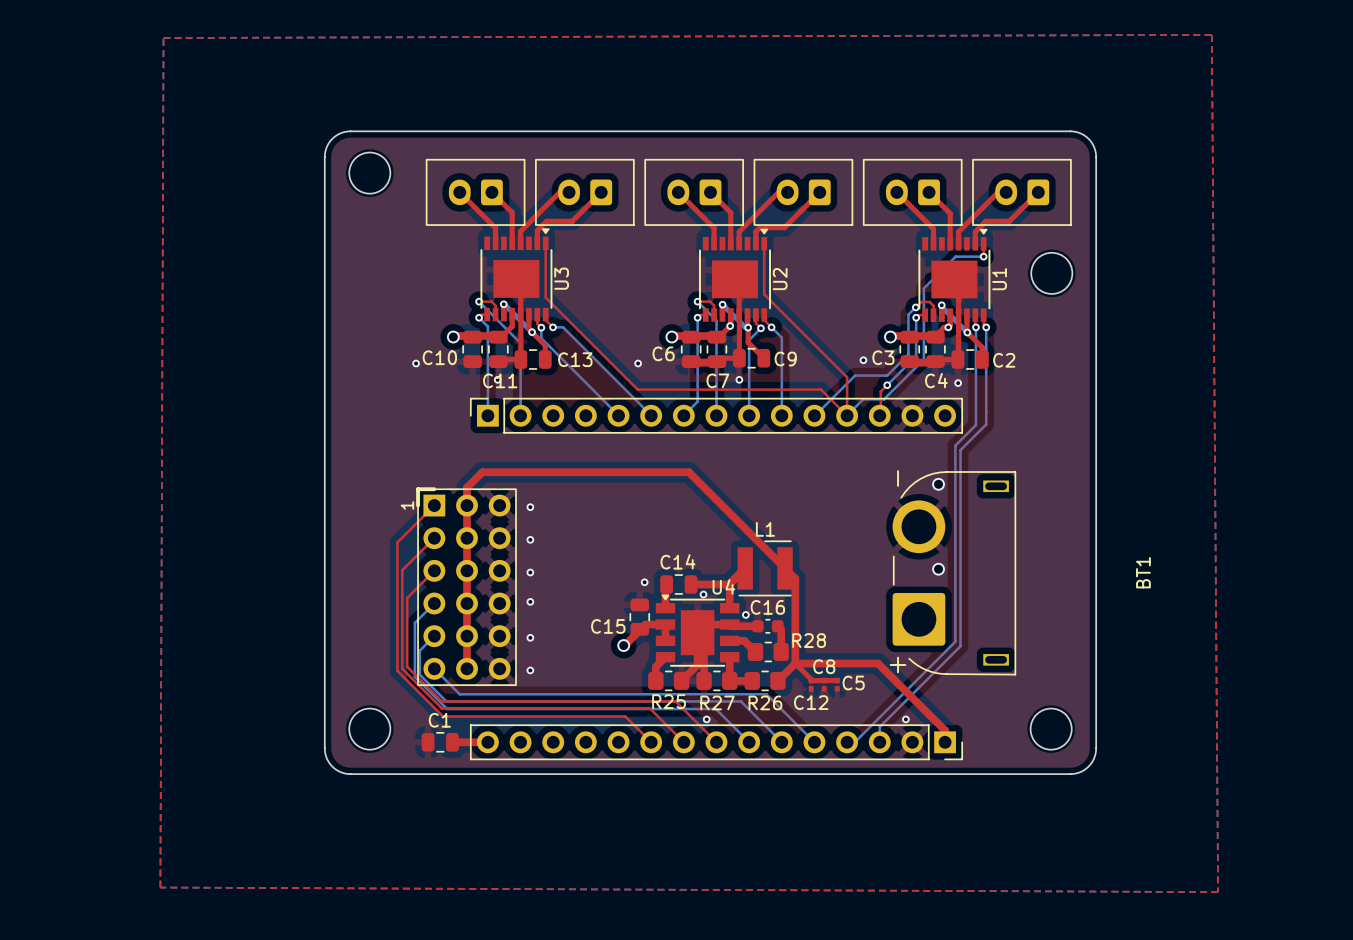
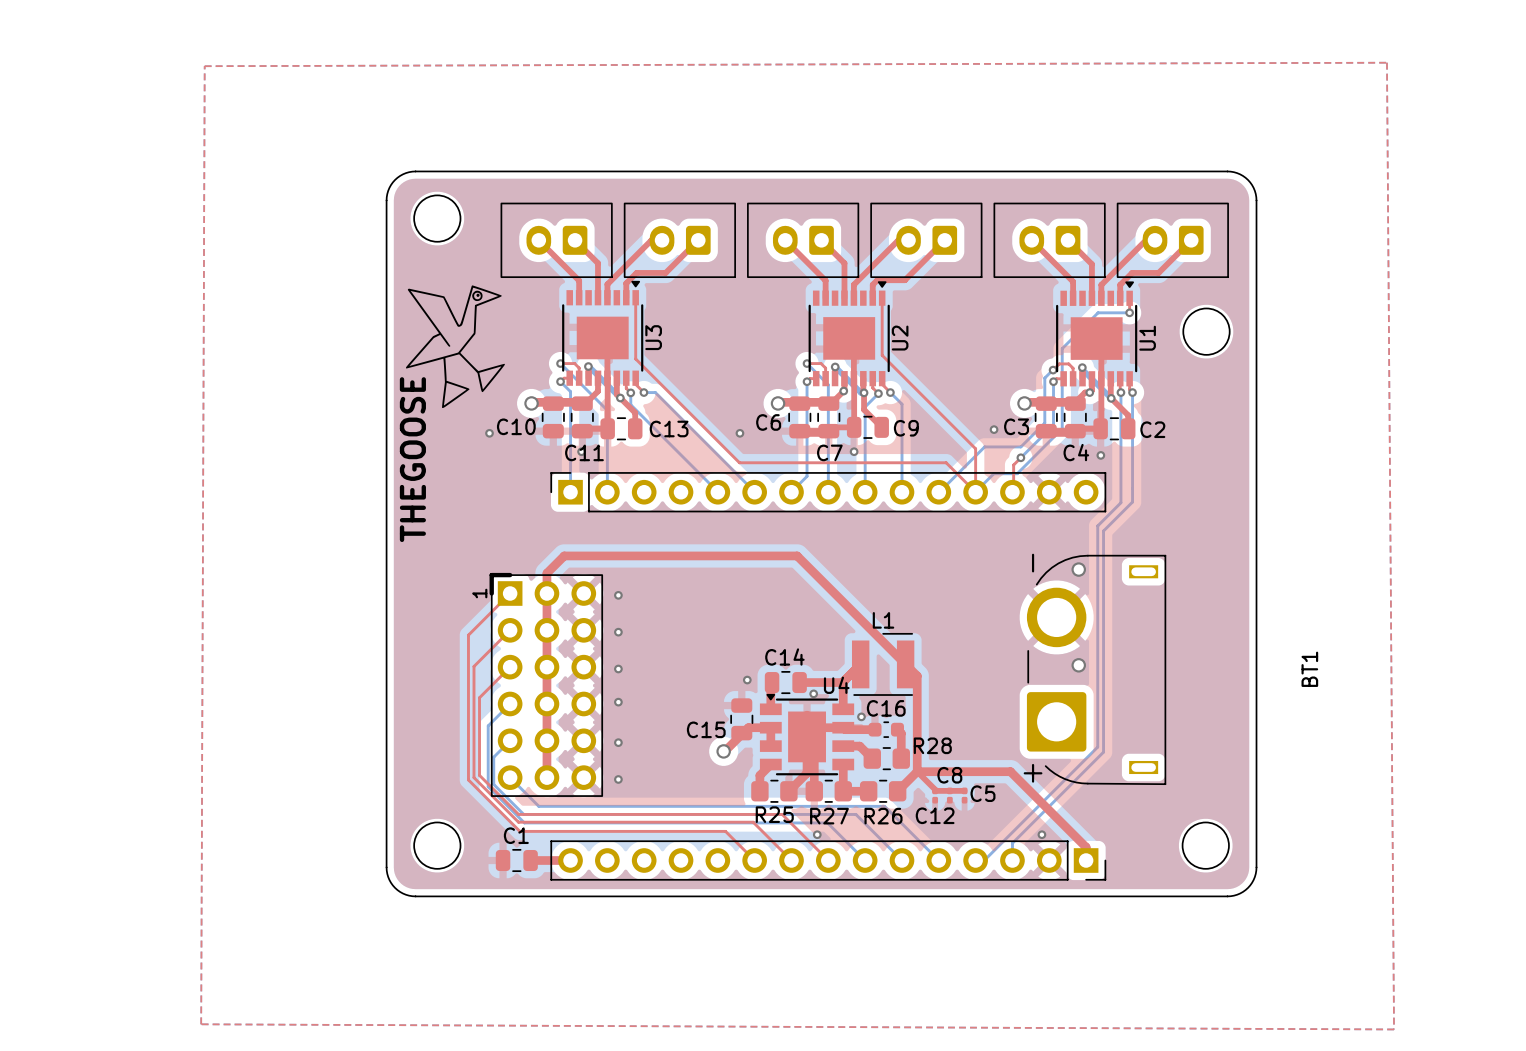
drawing: none -> [406, 285, 505, 409]
text: none -> THEGOOSE (412, 459)

